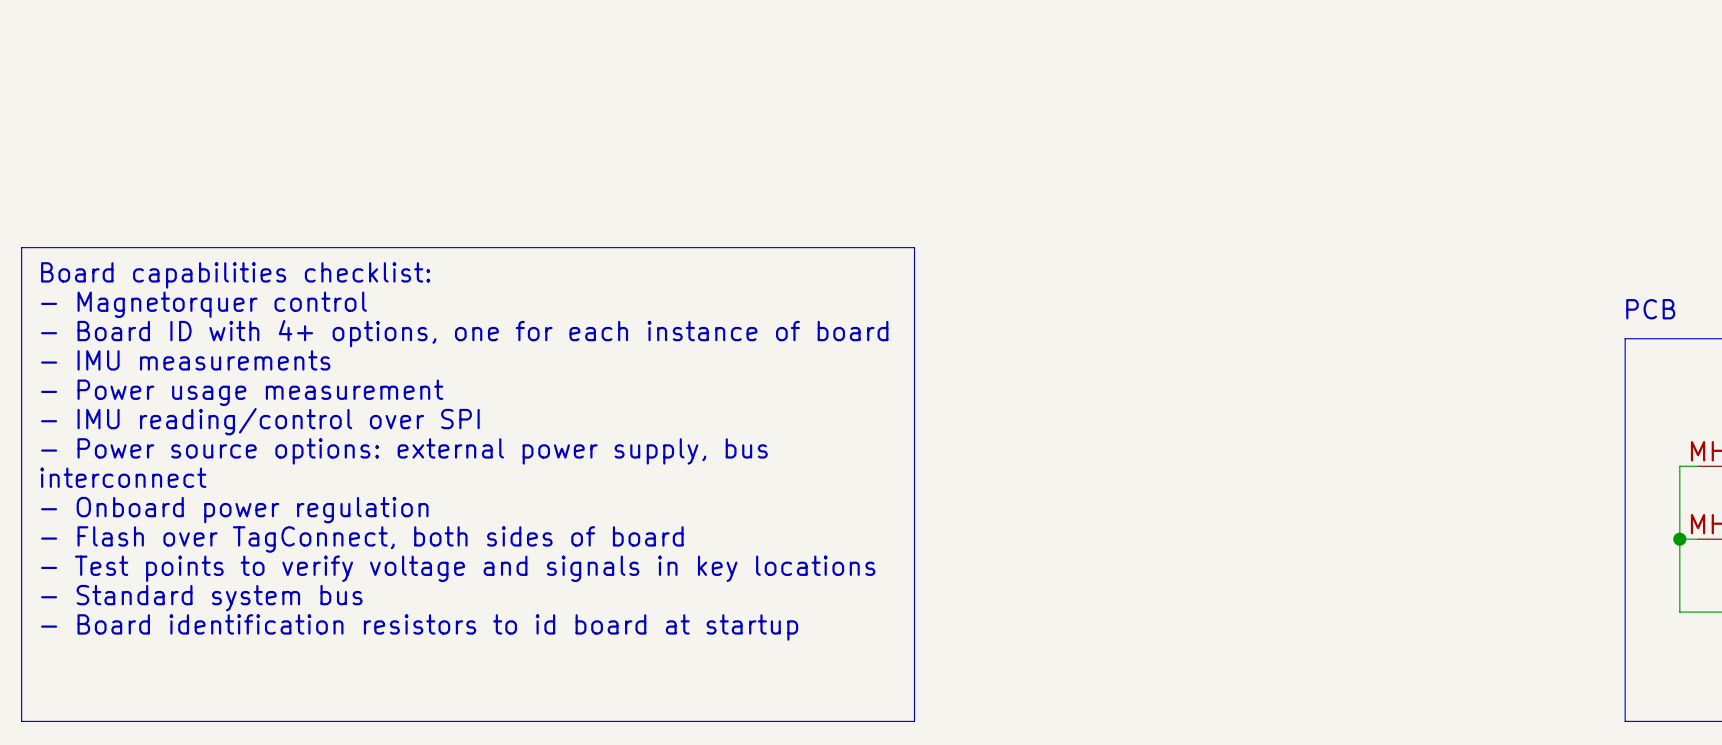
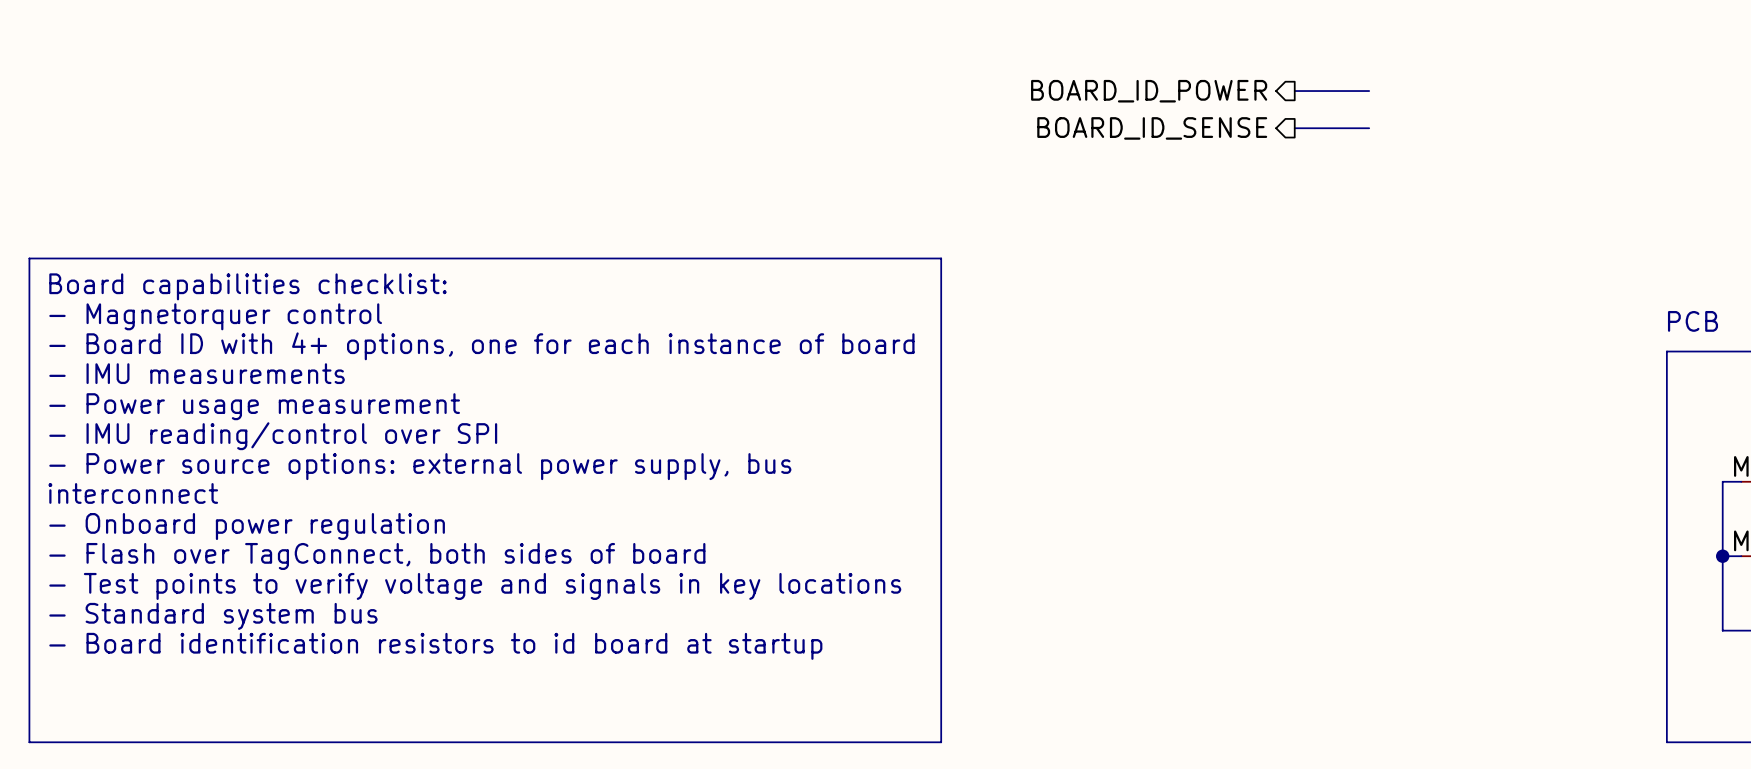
sheet pin: none -> BOARD_ID_POWER (1149, 91)
wire: none -> (1294, 91) (1369, 91)
sheet pin: none -> BOARD_ID_SENSE (1152, 128)
wire: none -> (1294, 128) (1369, 128)

